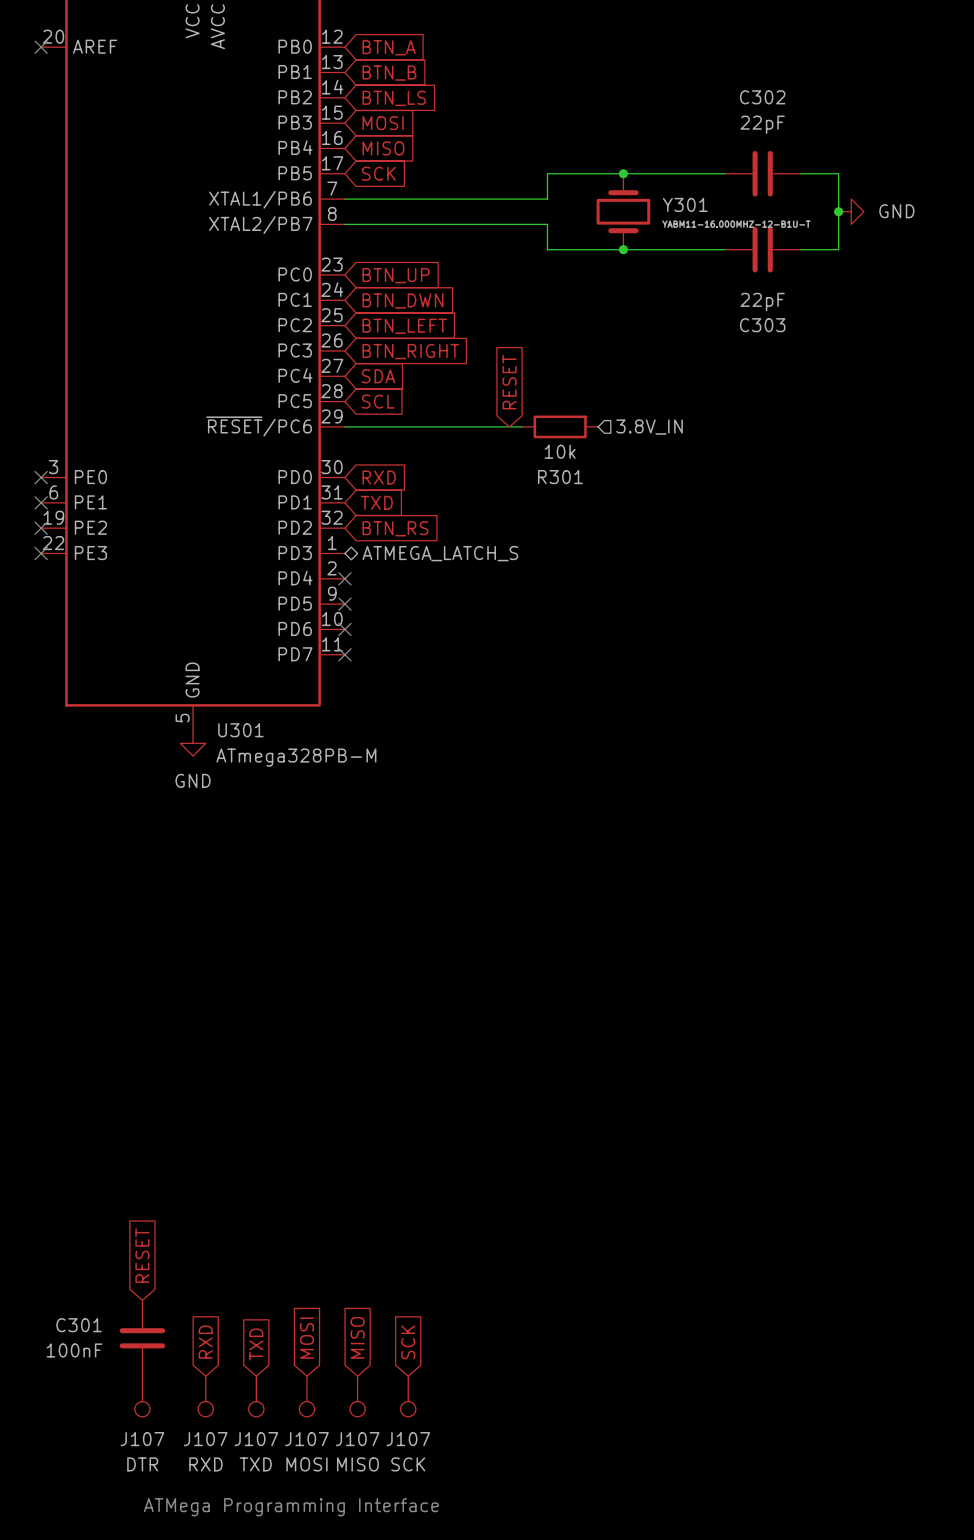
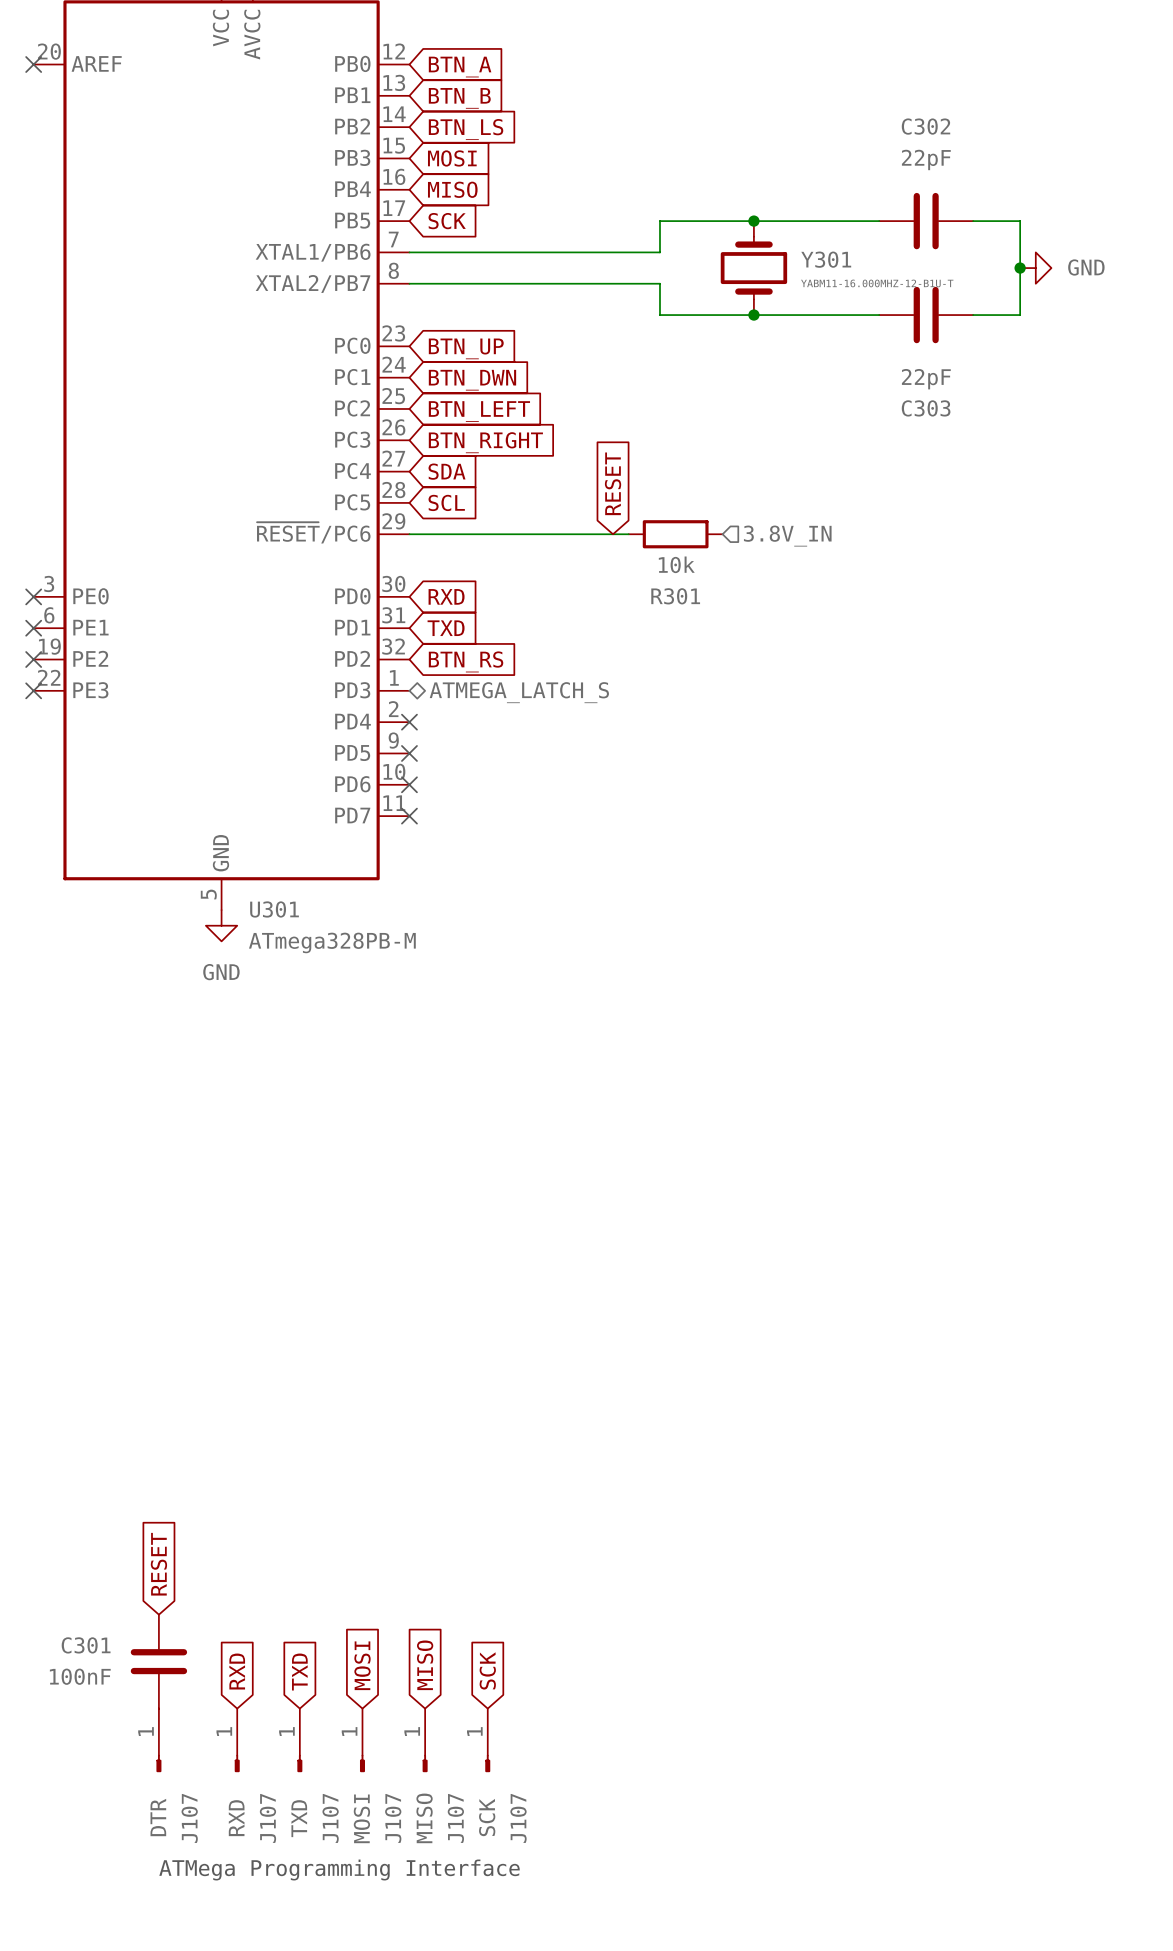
J107 symbol: [134, 1376, 151, 1417] -> [156, 1708, 162, 1773]
J107 symbol: [198, 1376, 214, 1417] -> [234, 1708, 240, 1773]
J107 symbol: [248, 1376, 264, 1417] -> [297, 1708, 303, 1773]
J107 symbol: [299, 1376, 315, 1417] -> [359, 1708, 365, 1773]
J107 symbol: [350, 1376, 366, 1417] -> [422, 1708, 428, 1773]
J107 symbol: [400, 1376, 416, 1417] -> [485, 1708, 491, 1773]
J107 name position: J107 (142, 1439) -> J107 (189, 1818)
J107 name position: J107 (205, 1439) -> J107 (267, 1818)
J107 name position: J107 (256, 1439) -> J107 (330, 1818)
J107 name position: J107 (306, 1439) -> J107 (393, 1818)
J107 name position: J107 (357, 1439) -> J107 (455, 1818)
J107 name position: J107 (408, 1439) -> J107 (518, 1818)

